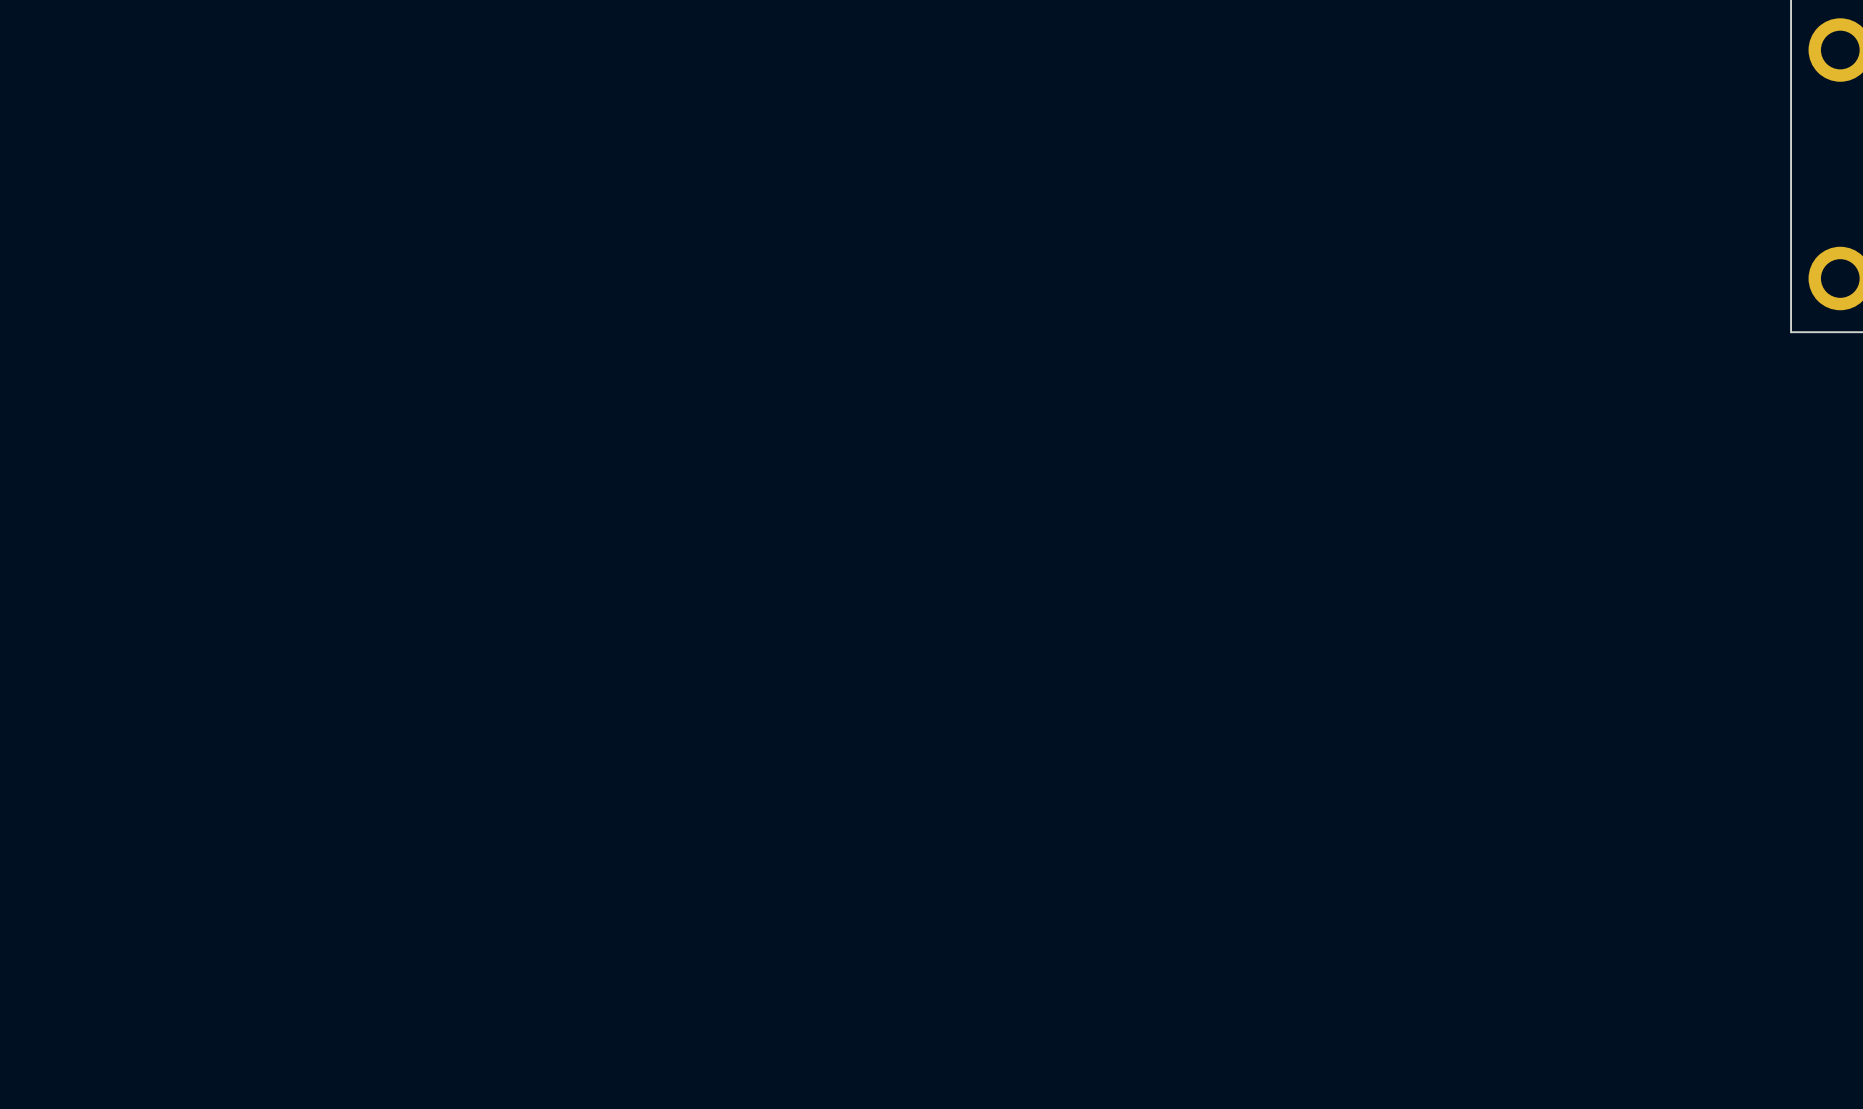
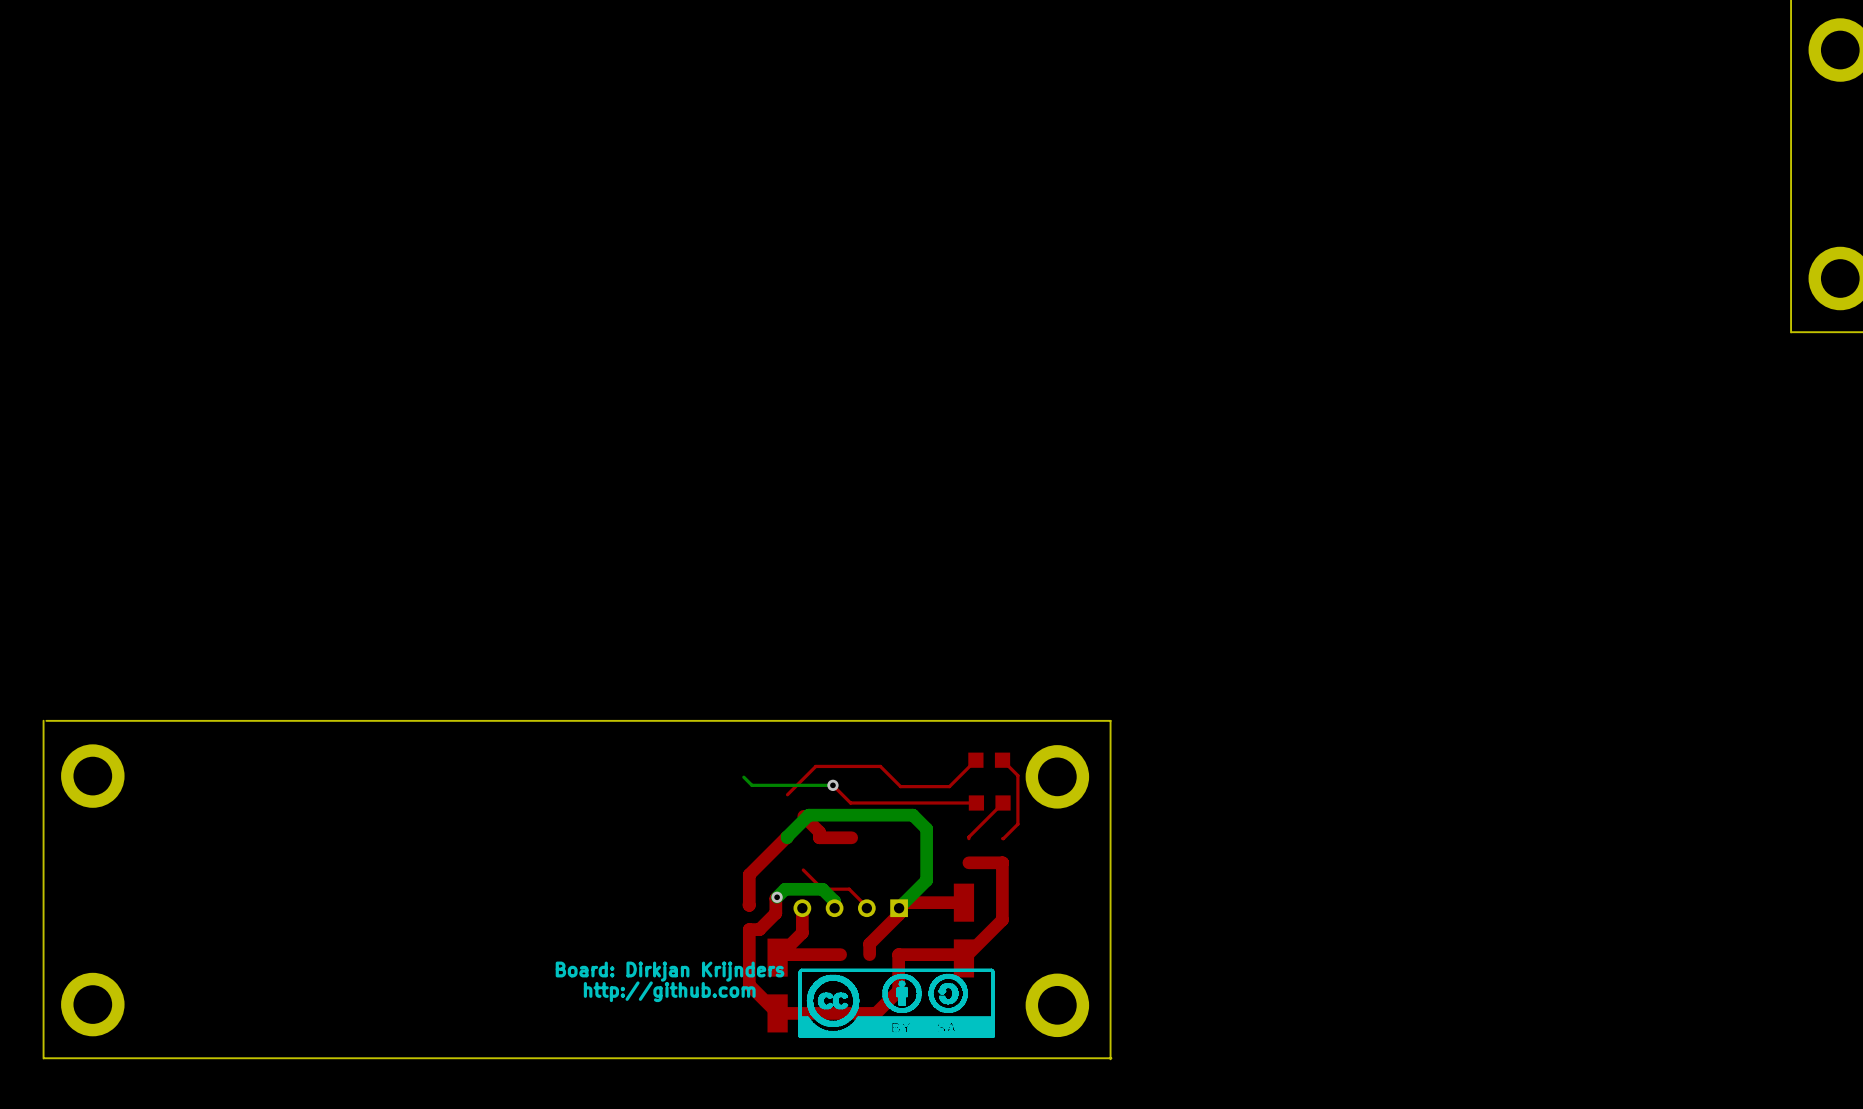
board edge: none -> (43, 720) (43, 1058)
board edge: none -> (46, 720) (1110, 720) (1110, 1059)
top track: none -> (975, 760) (949, 786) (900, 786) (880, 766) (815, 766) (787, 794)
part: none -> (989, 760)
top track: none -> (1002, 760) (1017, 775) (1017, 824) (1002, 838)
part: none -> (92, 776)
part: none -> (1057, 776)
bottom track: none -> (743, 777) (751, 785) (832, 785)
top track: none -> (832, 785) (850, 802) (976, 802)
via: none -> (832, 785)
part: none -> (989, 802)
top track: none -> (1003, 802) (968, 838)
top track: none -> (803, 816) (819, 831) (819, 837) (851, 837)
top track: none -> (787, 837) (749, 874) (748, 904)
bottom track: none -> (787, 837) (808, 815) (912, 815) (926, 828) (926, 880) (899, 907)
top track: none -> (968, 862) (1002, 862) (1002, 919) (967, 954) (898, 954) (898, 990) (876, 1013) (777, 1013) (749, 985) (749, 929) (759, 929) (775, 913) (777, 897)
top track: none -> (803, 870) (822, 889) (849, 889) (866, 908)
bottom track: none -> (777, 897) (785, 889) (822, 889) (834, 901) (834, 908)
via: none -> (777, 897)
top track: none -> (963, 902) (904, 902) (899, 908) (899, 914) (869, 943) (869, 954)
top track: none -> (802, 908) (802, 932) (780, 954) (840, 954)
part: none -> (850, 908)
part: none -> (963, 930)
drawing: none -> [798, 968, 995, 1038]
text: none -> Board: Dirkjan Krijnders (670, 971)
part: none -> (777, 985)
text: none -> http://github.com (669, 991)
part: none -> (92, 1004)
part: none -> (1057, 1005)
board edge: none -> (1111, 1058) (44, 1058)

